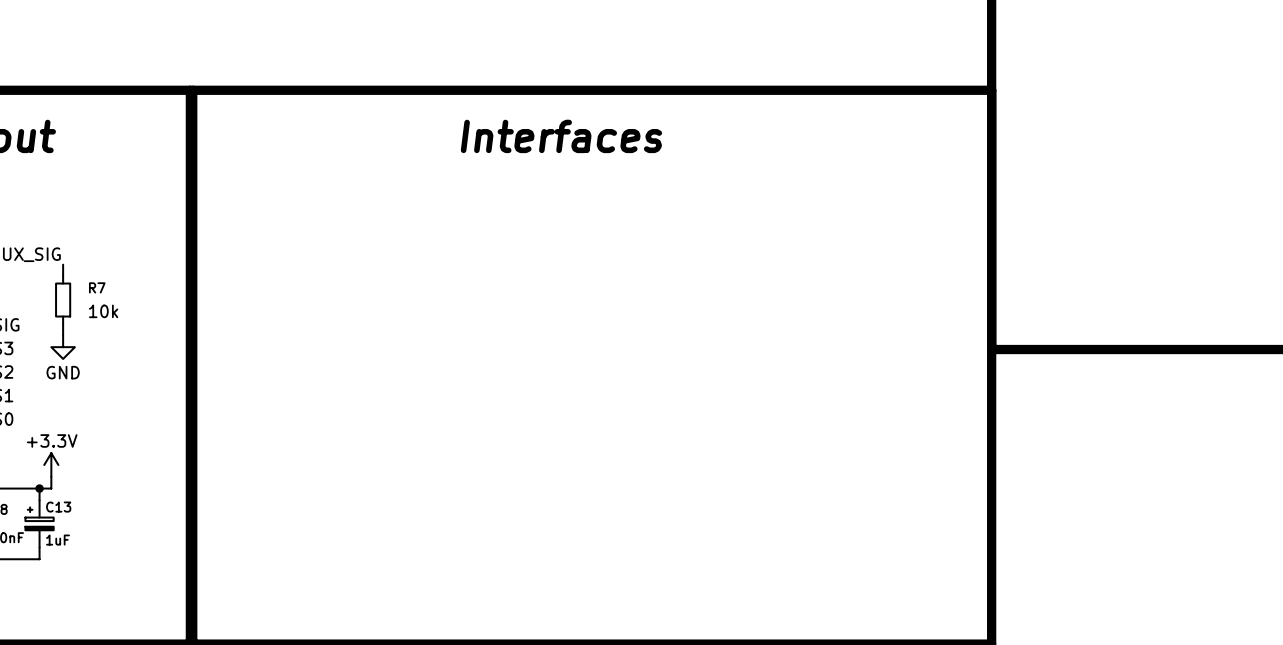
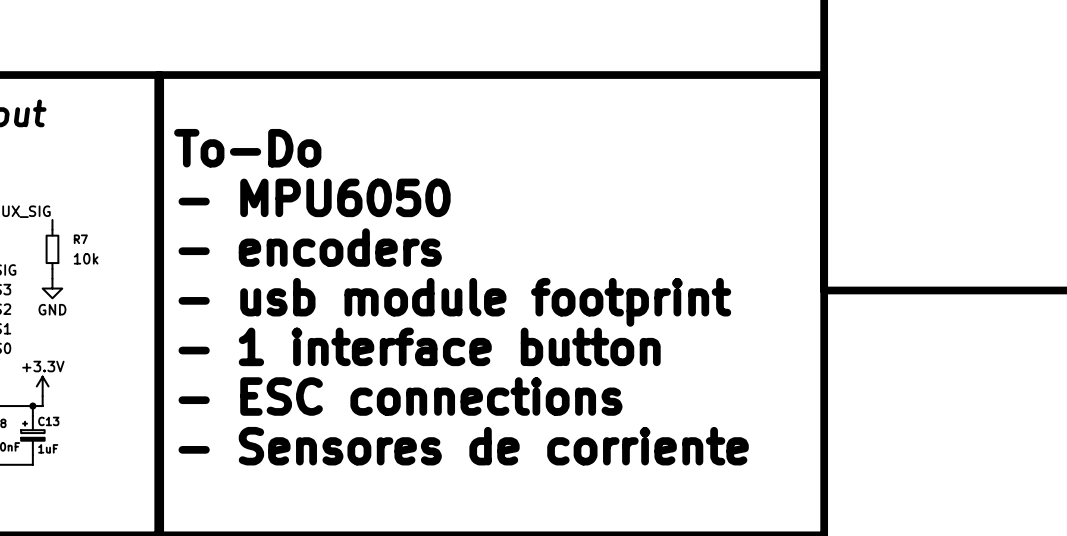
text: Interfaces (561, 136) -> none
text: none -> To-Do (247, 148)
text: none -> - MPU6050 (314, 197)
text: none -> - encoders (310, 247)
text: none -> - usb module footprint (454, 302)
text: none -> - 1 interface button (419, 346)
text: none -> - ESC connections (400, 396)
text: none -> - Sensores de corriente (463, 446)

